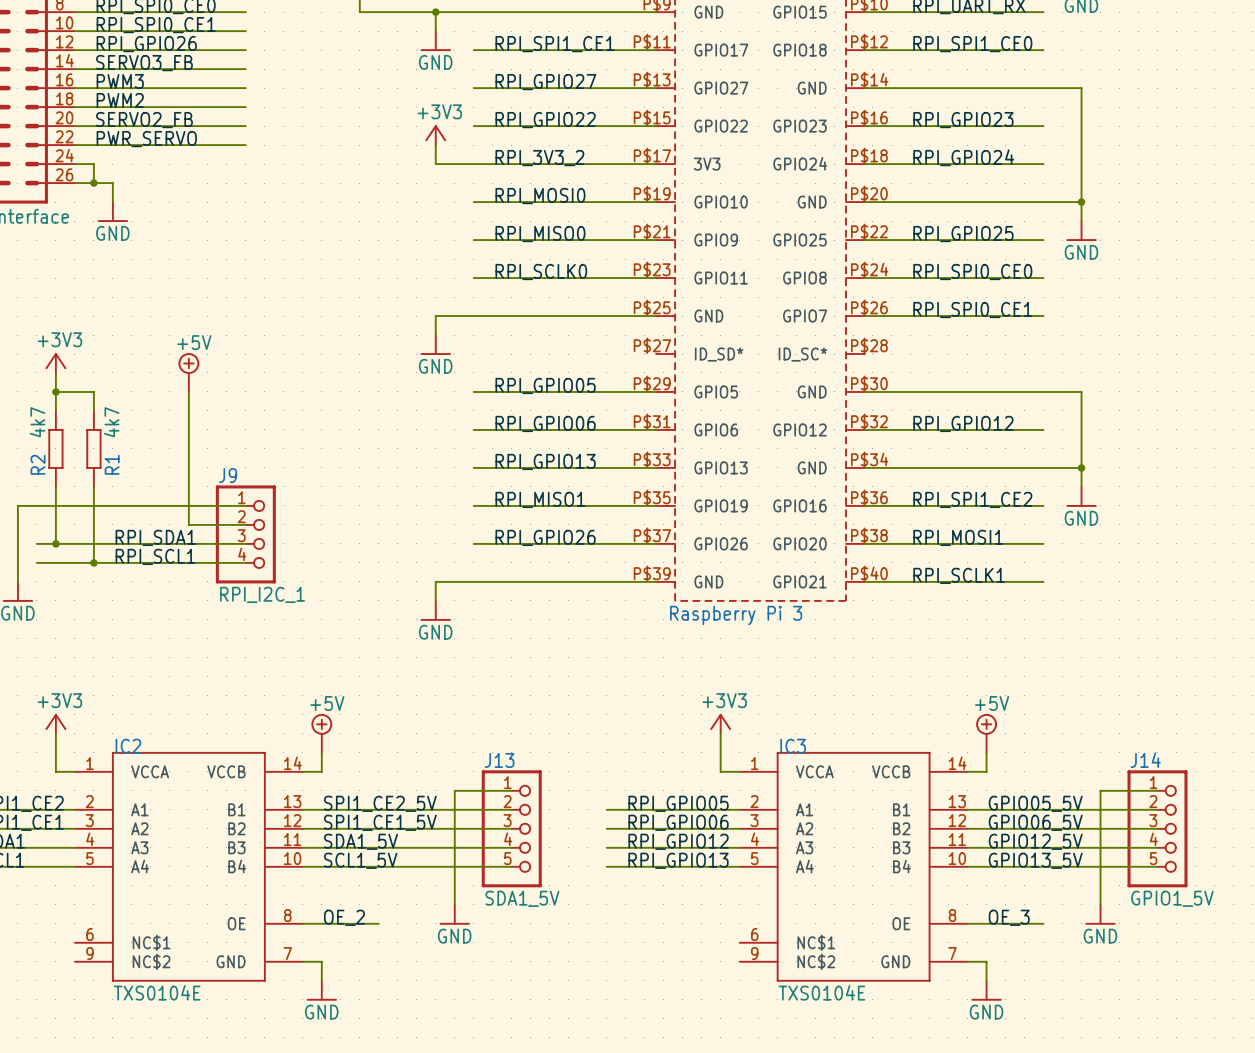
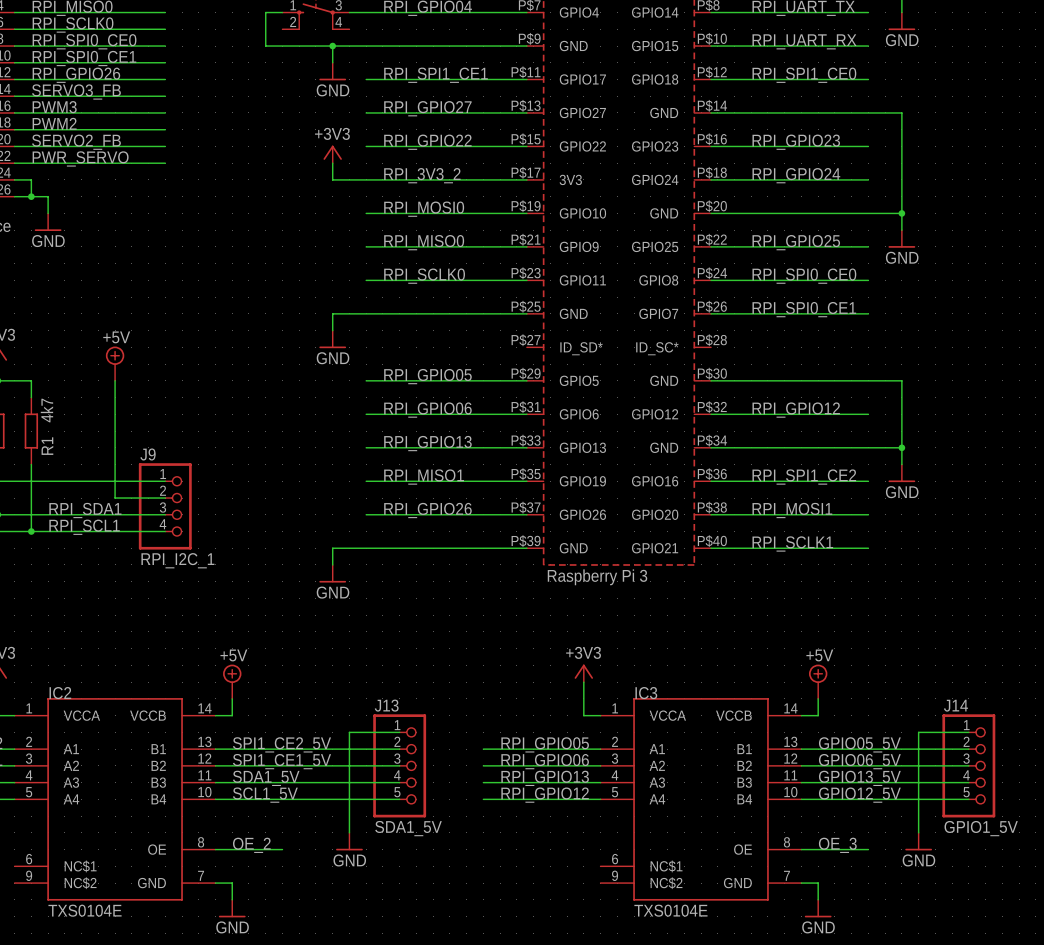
label: RPI_GPIO12 (678, 841) -> RPI_GPIO13 (545, 778)
label: GPIO12_5V (1035, 841) -> GPIO13_5V (859, 778)
label: RPI_GPIO13 (678, 860) -> RPI_GPIO12 (545, 795)
label: GPIO13_5V (1035, 860) -> GPIO12_5V (859, 795)

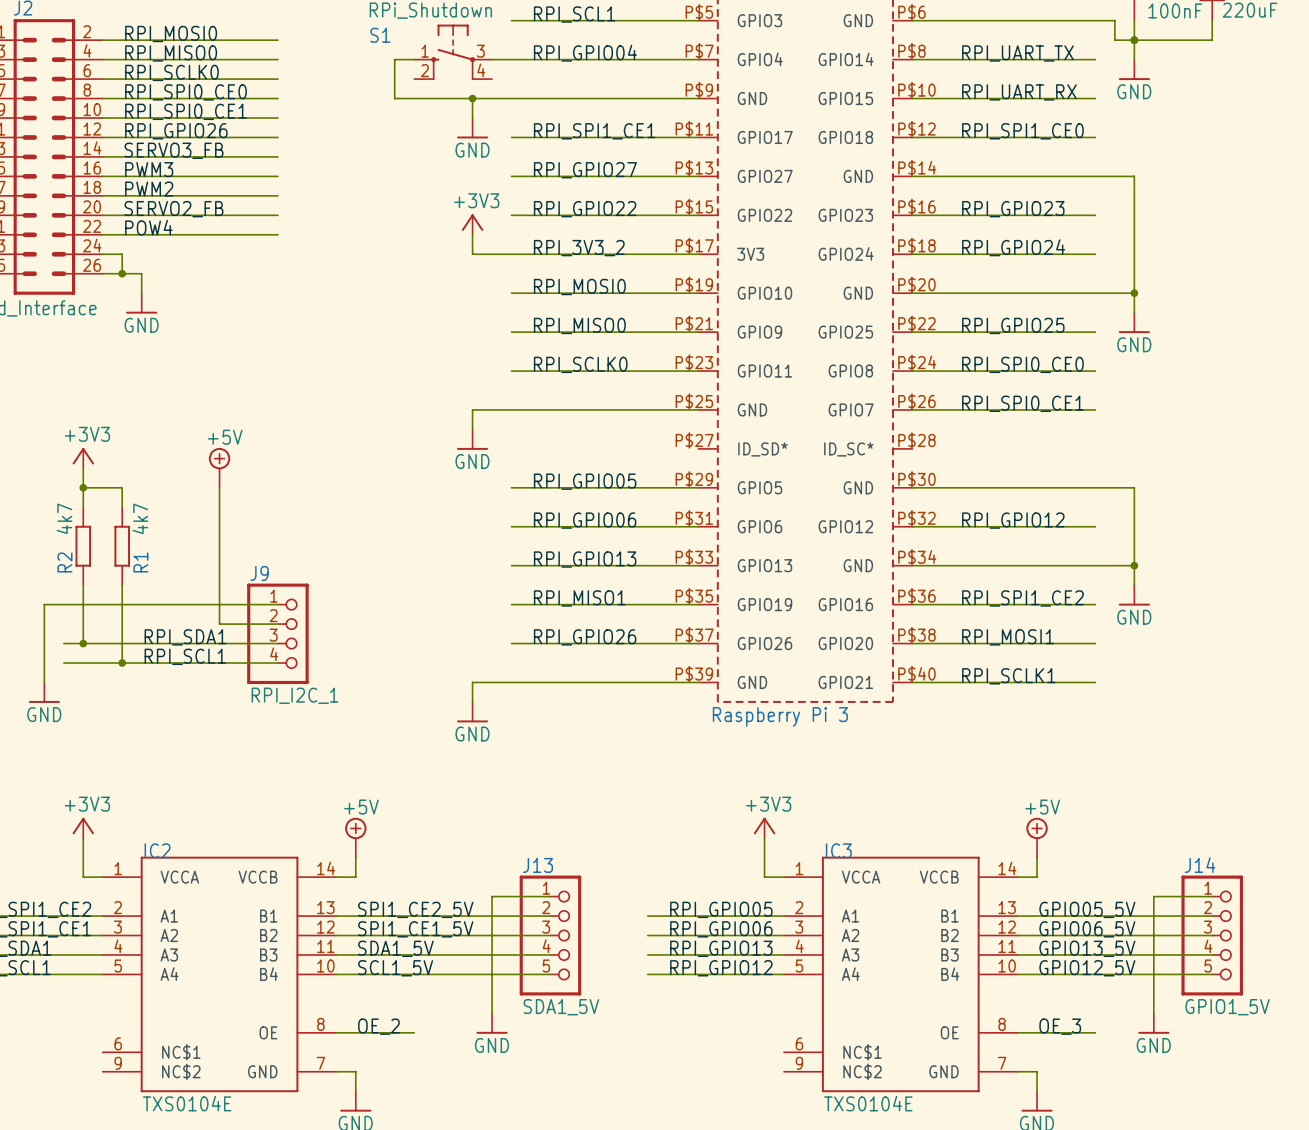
label: PWR_SERVO (80, 158) -> POW4 (148, 227)

